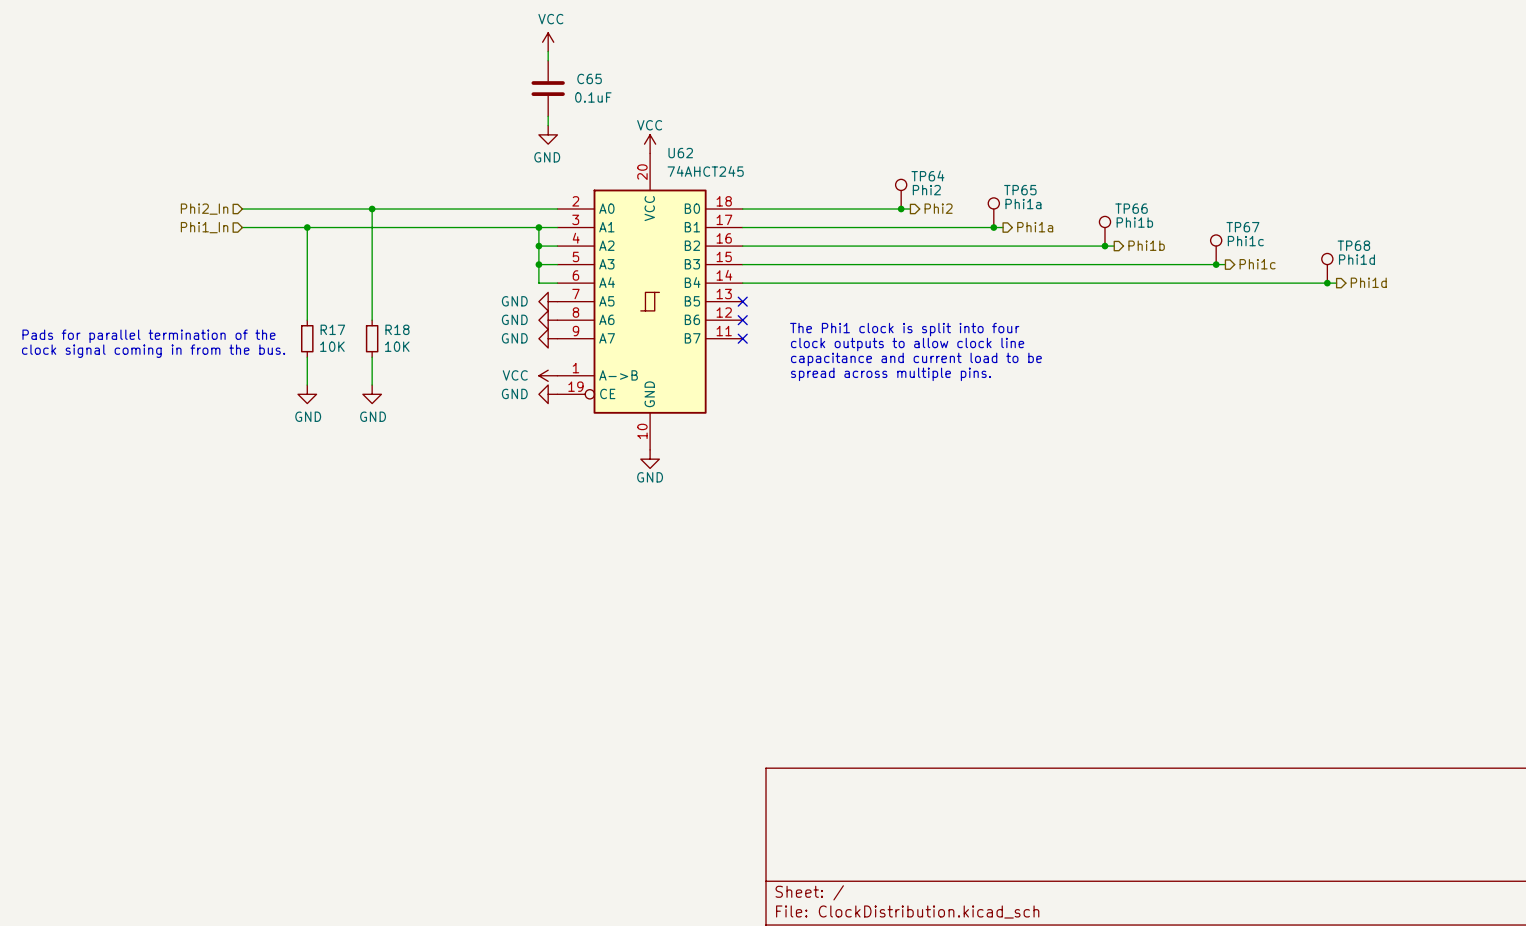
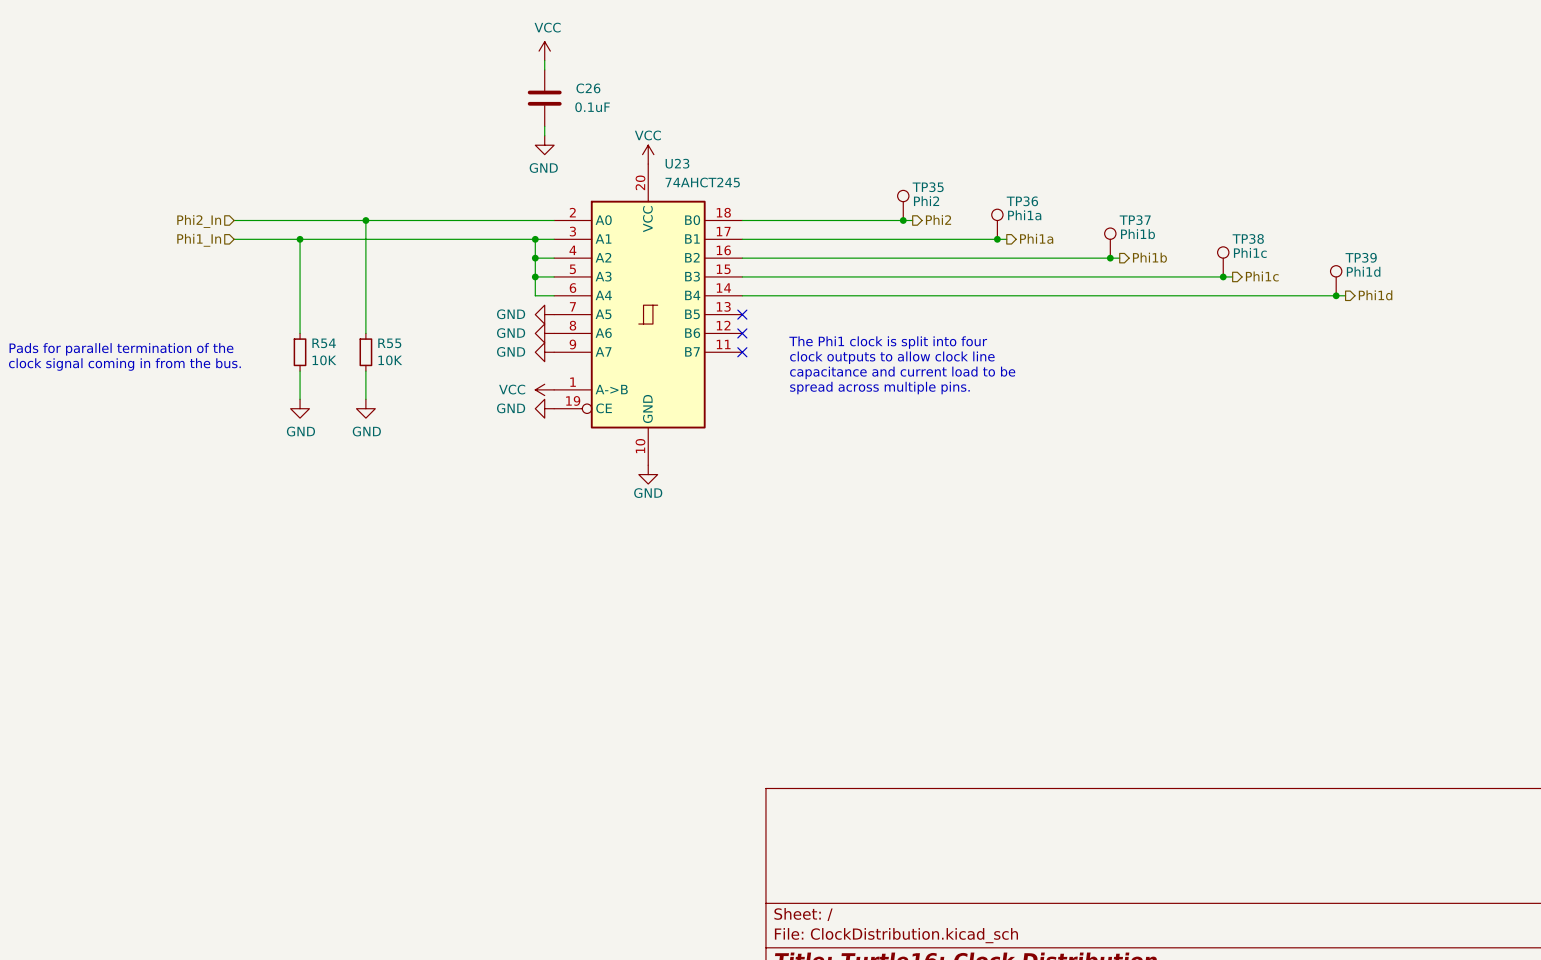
C65 name: C65 (589, 78) -> C26 (588, 88)
U62 name: U62 (680, 153) -> U23 (677, 163)
TP64 name: TP64 (927, 176) -> TP35 (928, 187)
TP65 name: TP65 (1020, 190) -> TP36 (1022, 201)
TP66 name: TP66 (1131, 208) -> TP37 (1135, 220)
TP67 name: TP67 (1242, 227) -> TP38 (1248, 238)
TP68 name: TP68 (1353, 245) -> TP39 (1361, 257)
R17 name: R17 (332, 329) -> R54 (324, 343)
R18 name: R18 (397, 329) -> R55 (389, 343)

